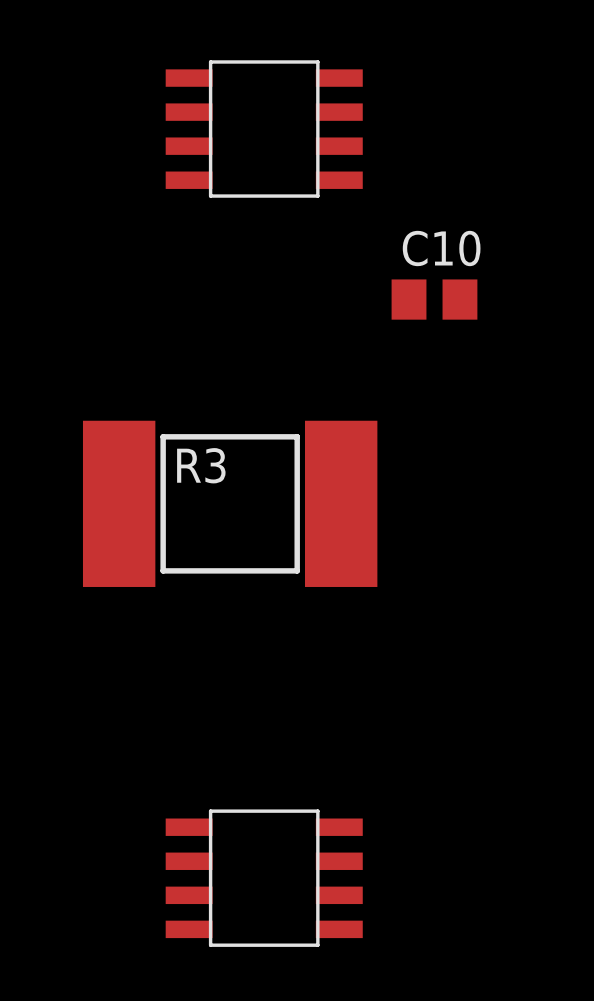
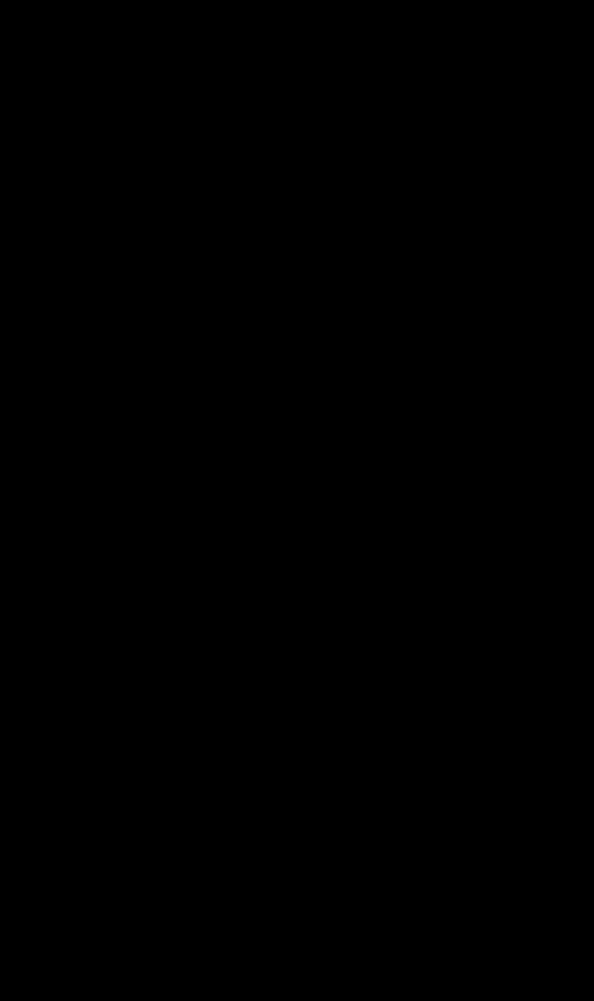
part: (264, 129) -> none
C10: (434, 299) -> none
R3: (230, 503) -> none
part: (264, 878) -> none

